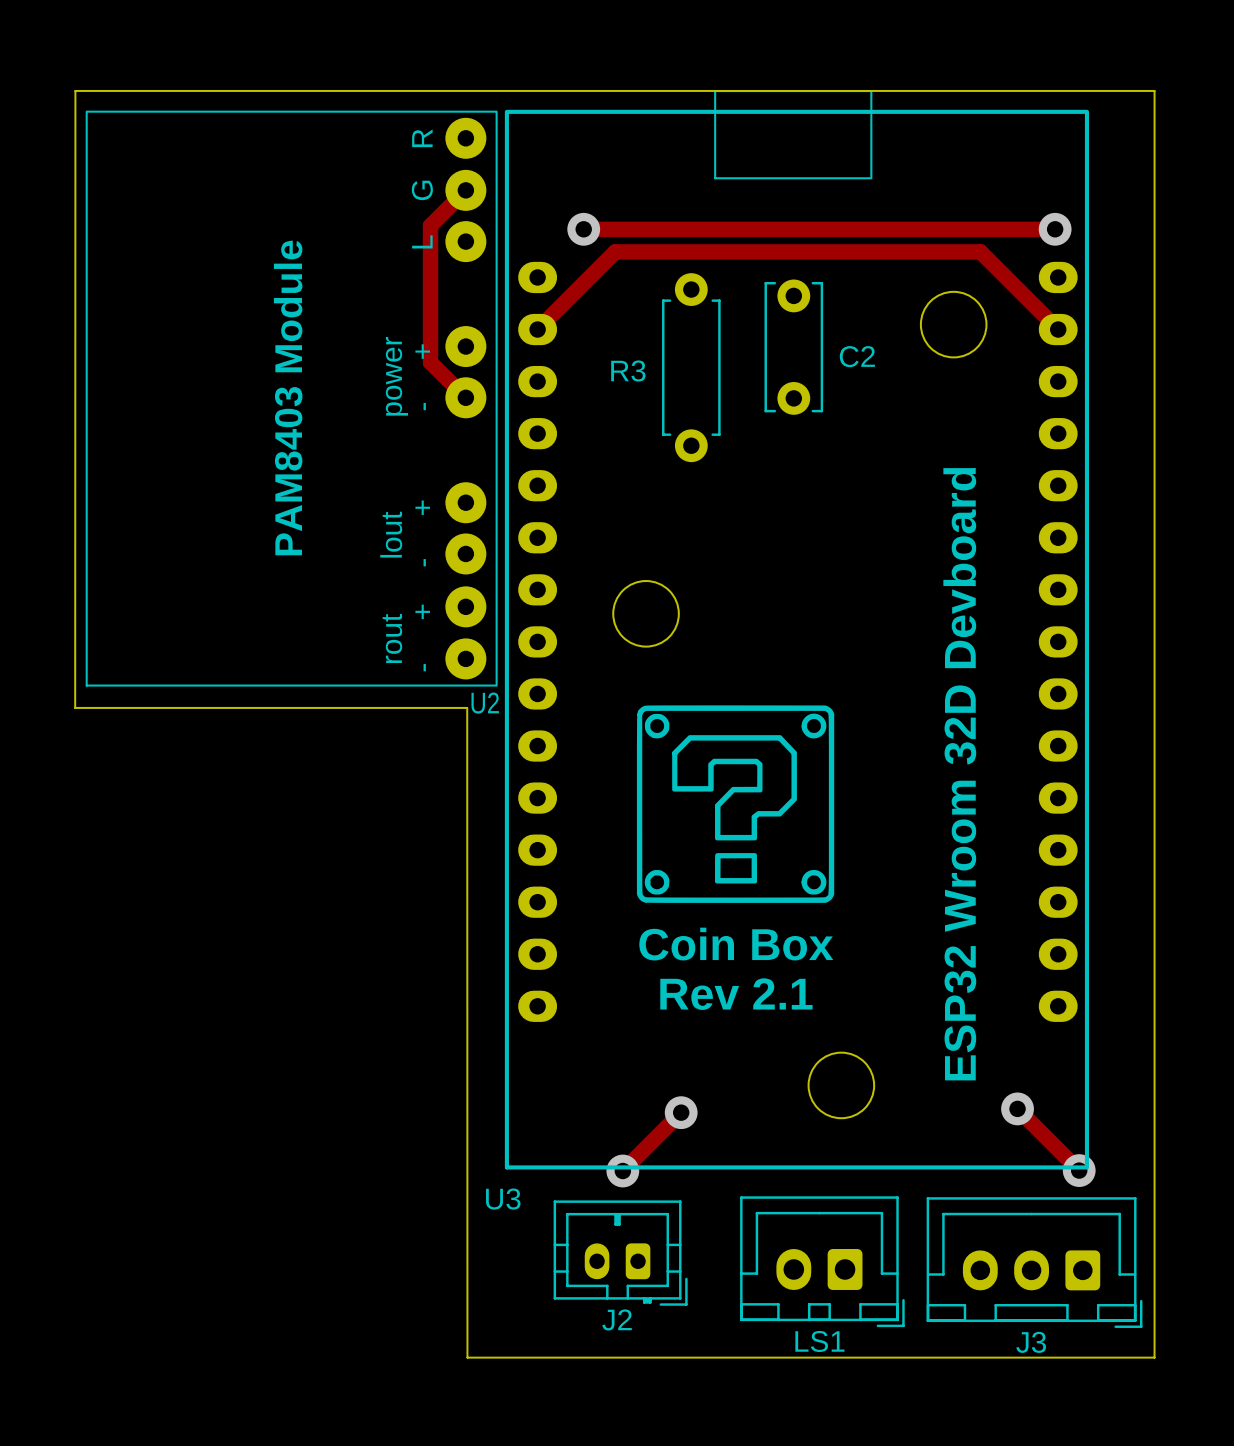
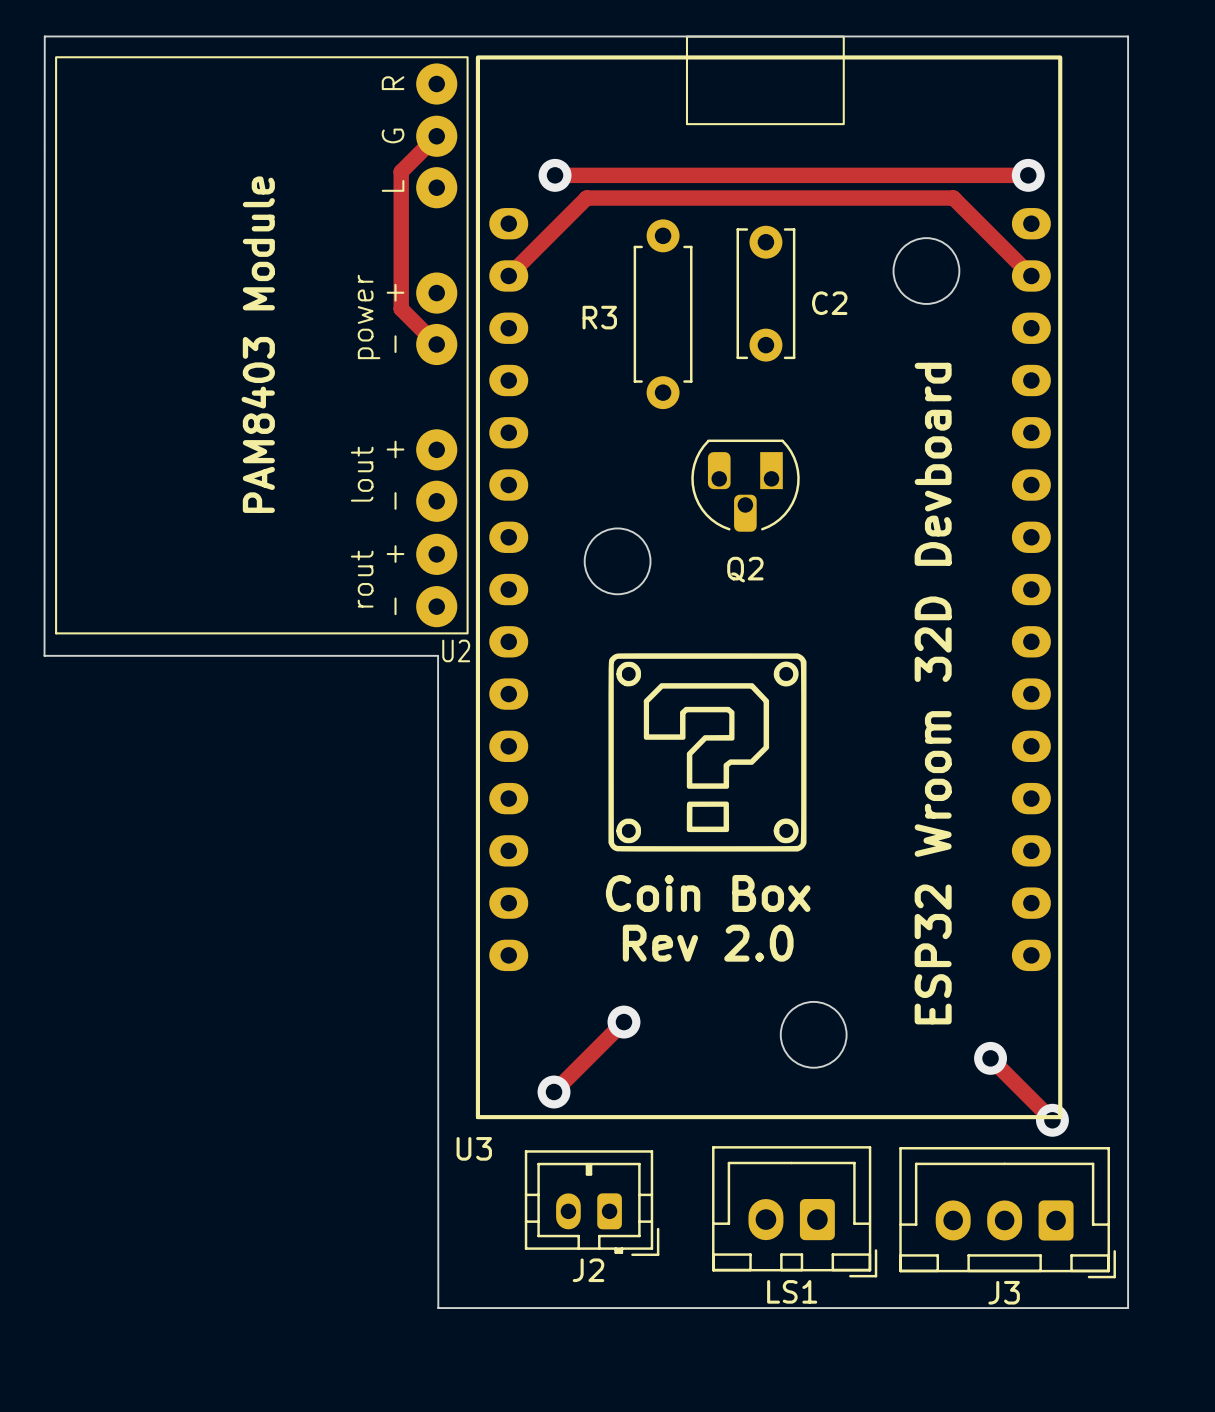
Q2: none -> (745, 485)
text: Rev 2.1 (736, 994) -> Rev 2.0 (708, 943)
track: none -> (623, 1022) (554, 1092)
track: (681, 1112) (622, 1171) -> none
via position: (681, 1112) -> (623, 1022)
via position: (622, 1171) -> (554, 1092)

